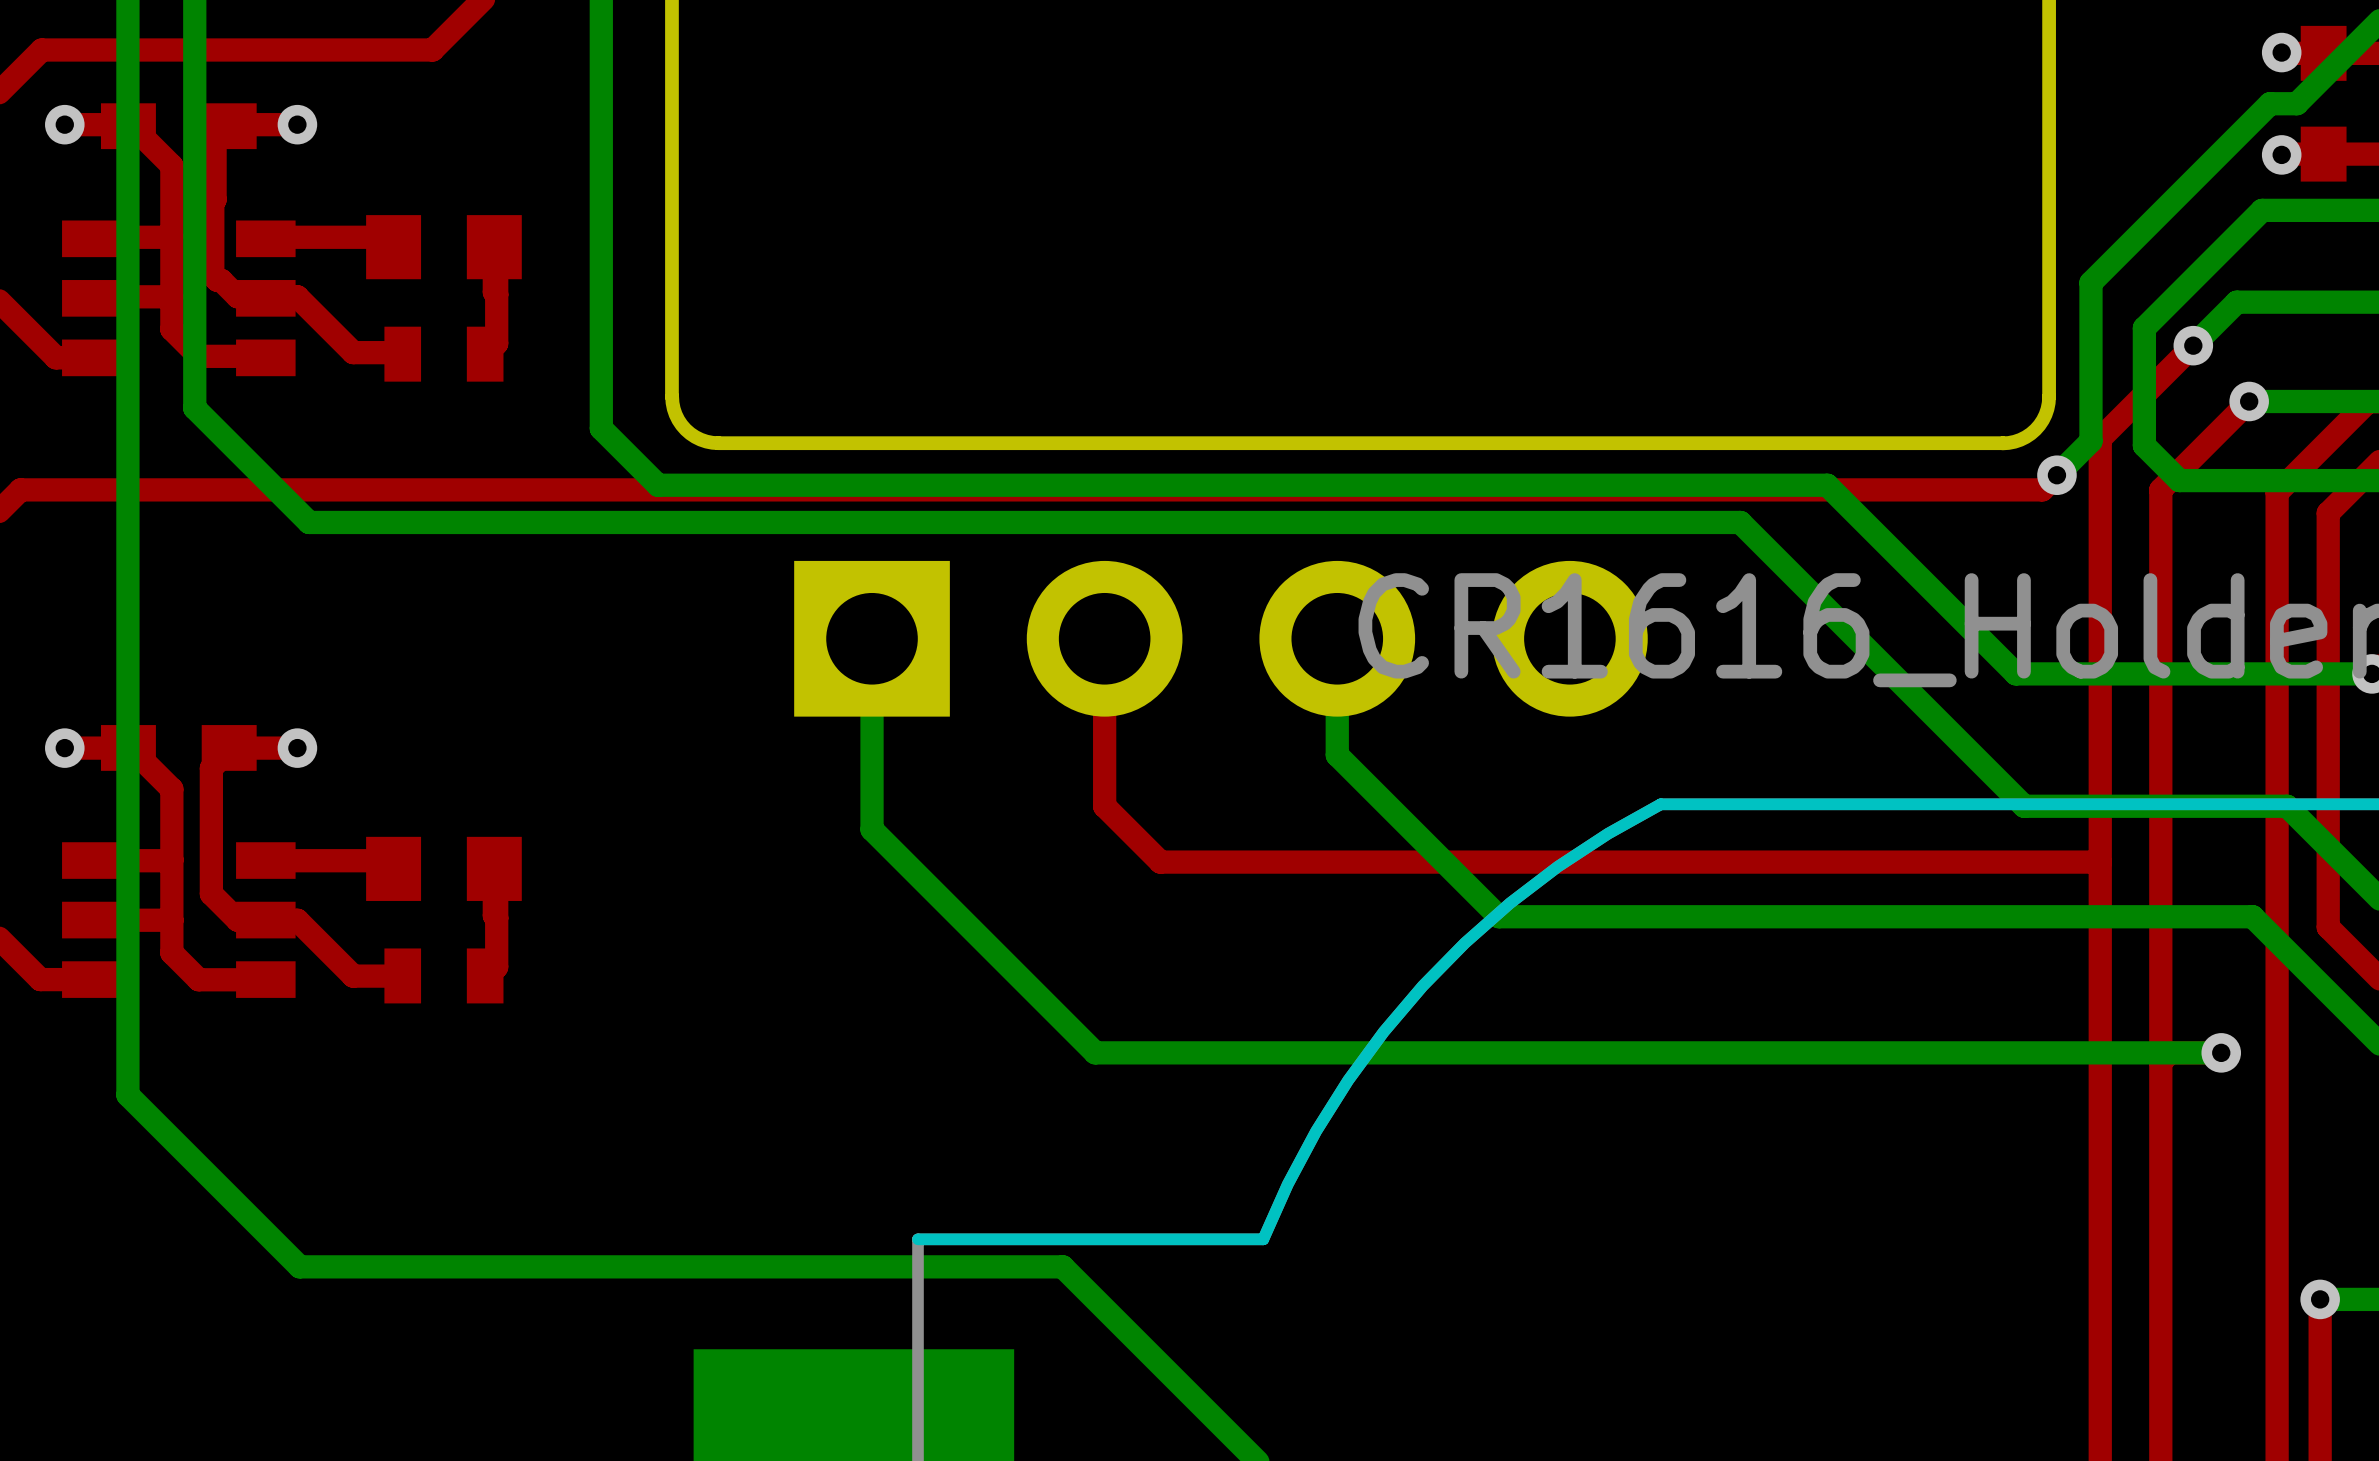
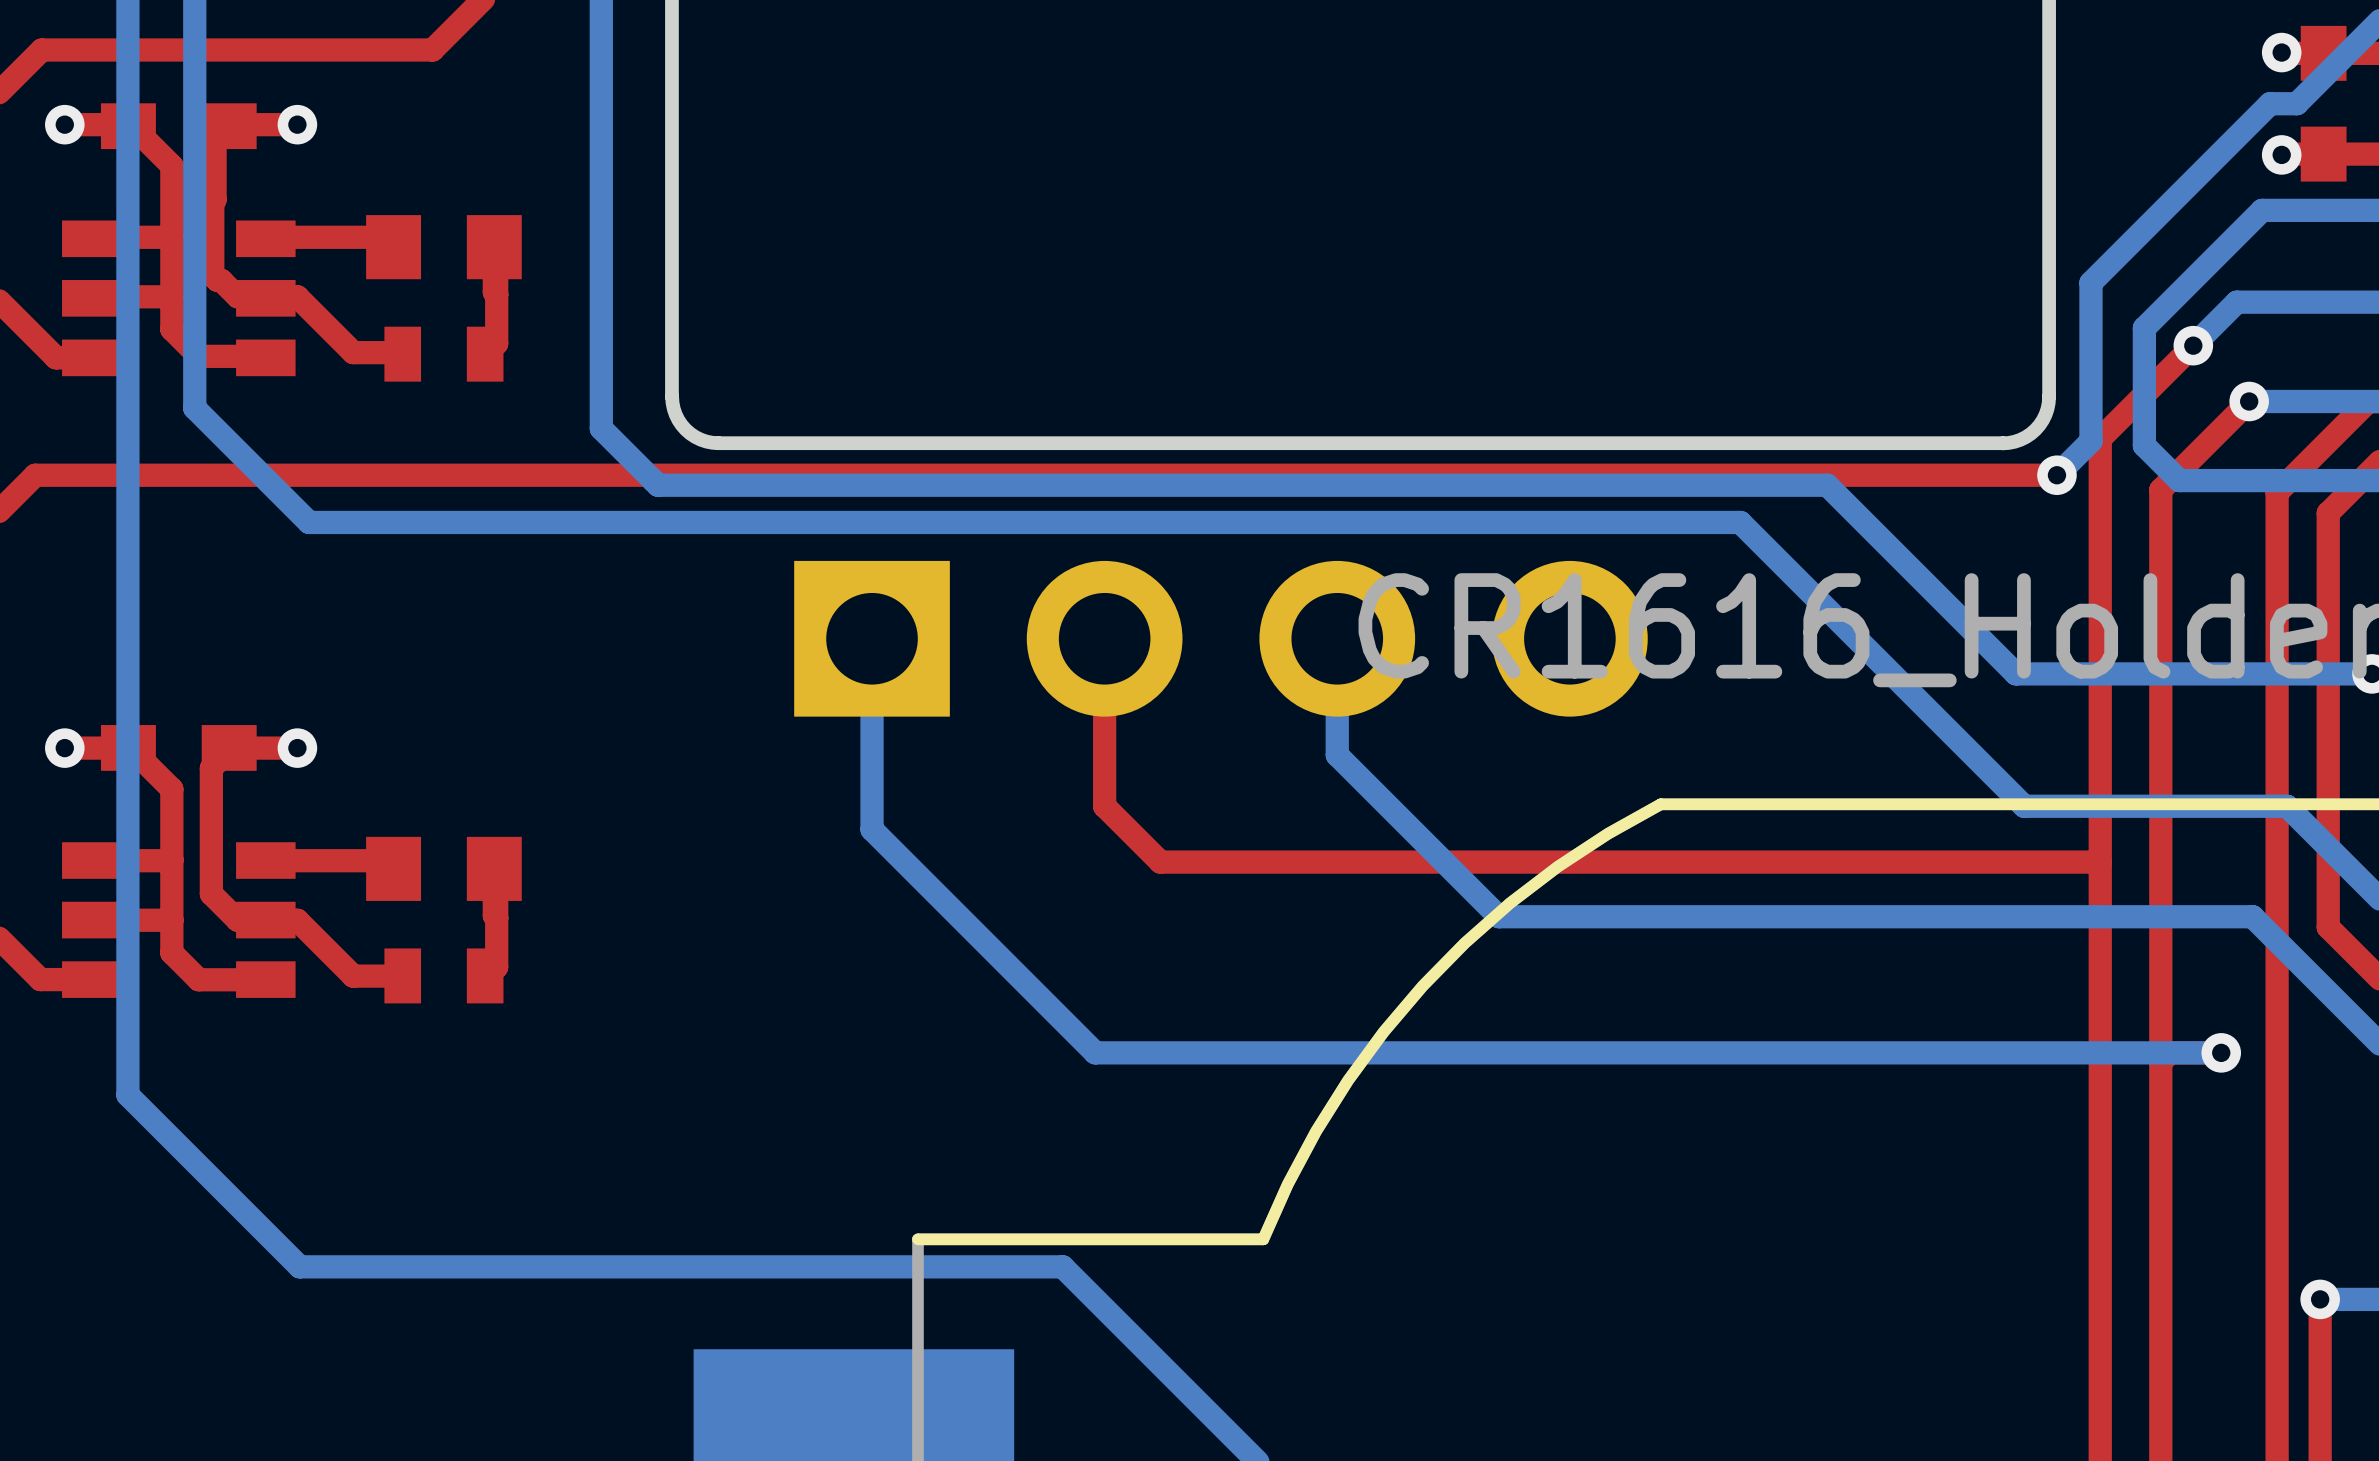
top track: (2056, 475) (2042, 489) (20, 489) -> (2056, 475) (35, 475) (20, 489)

